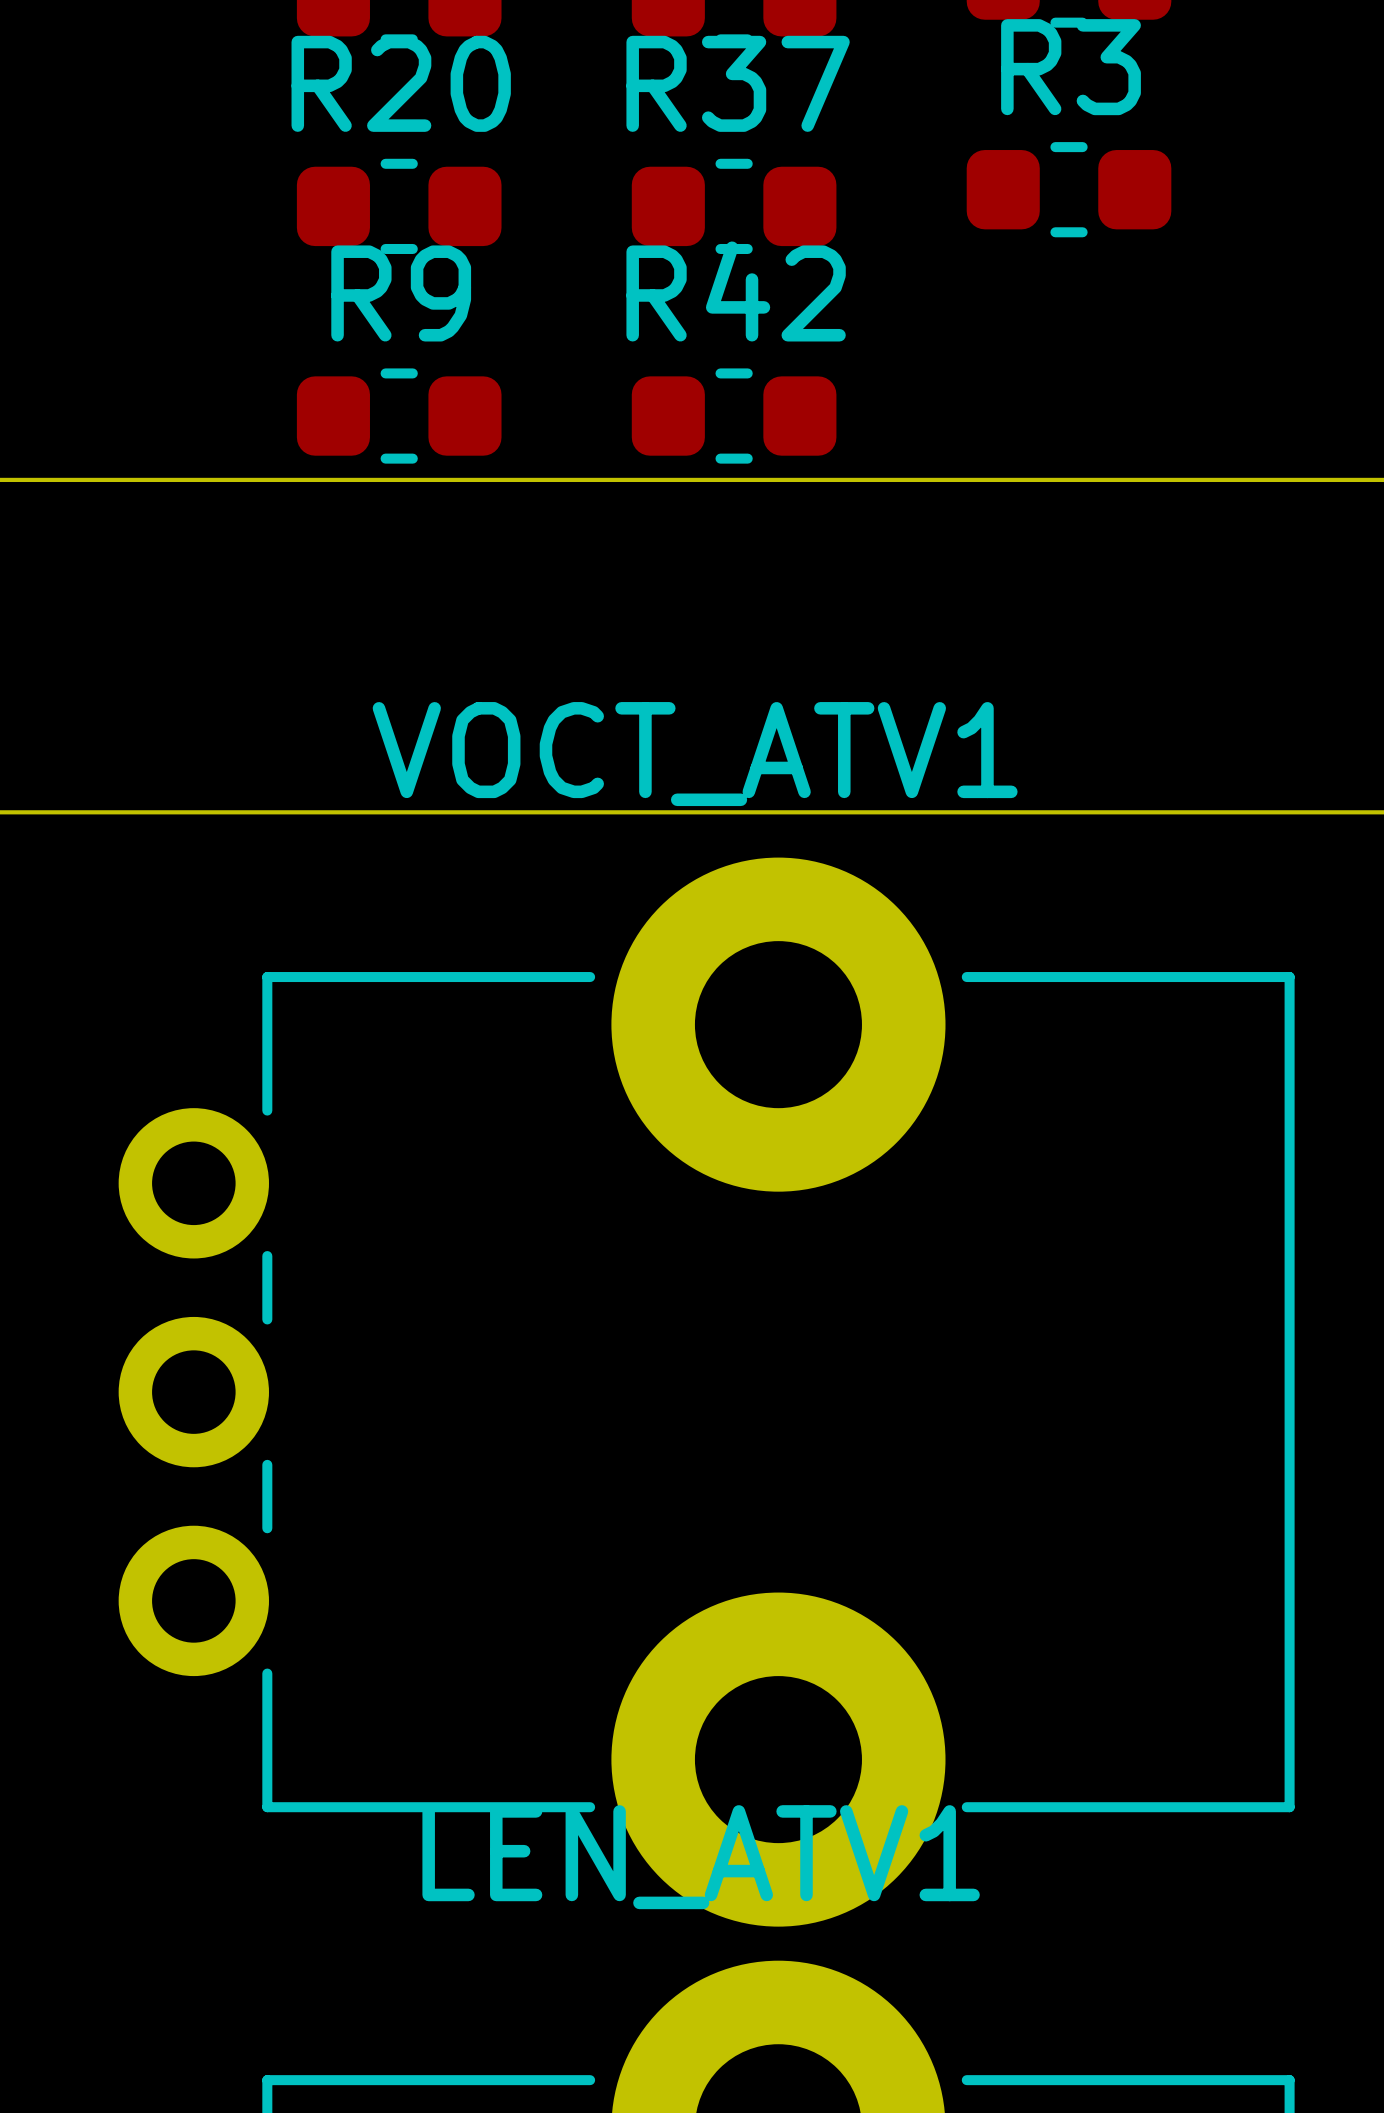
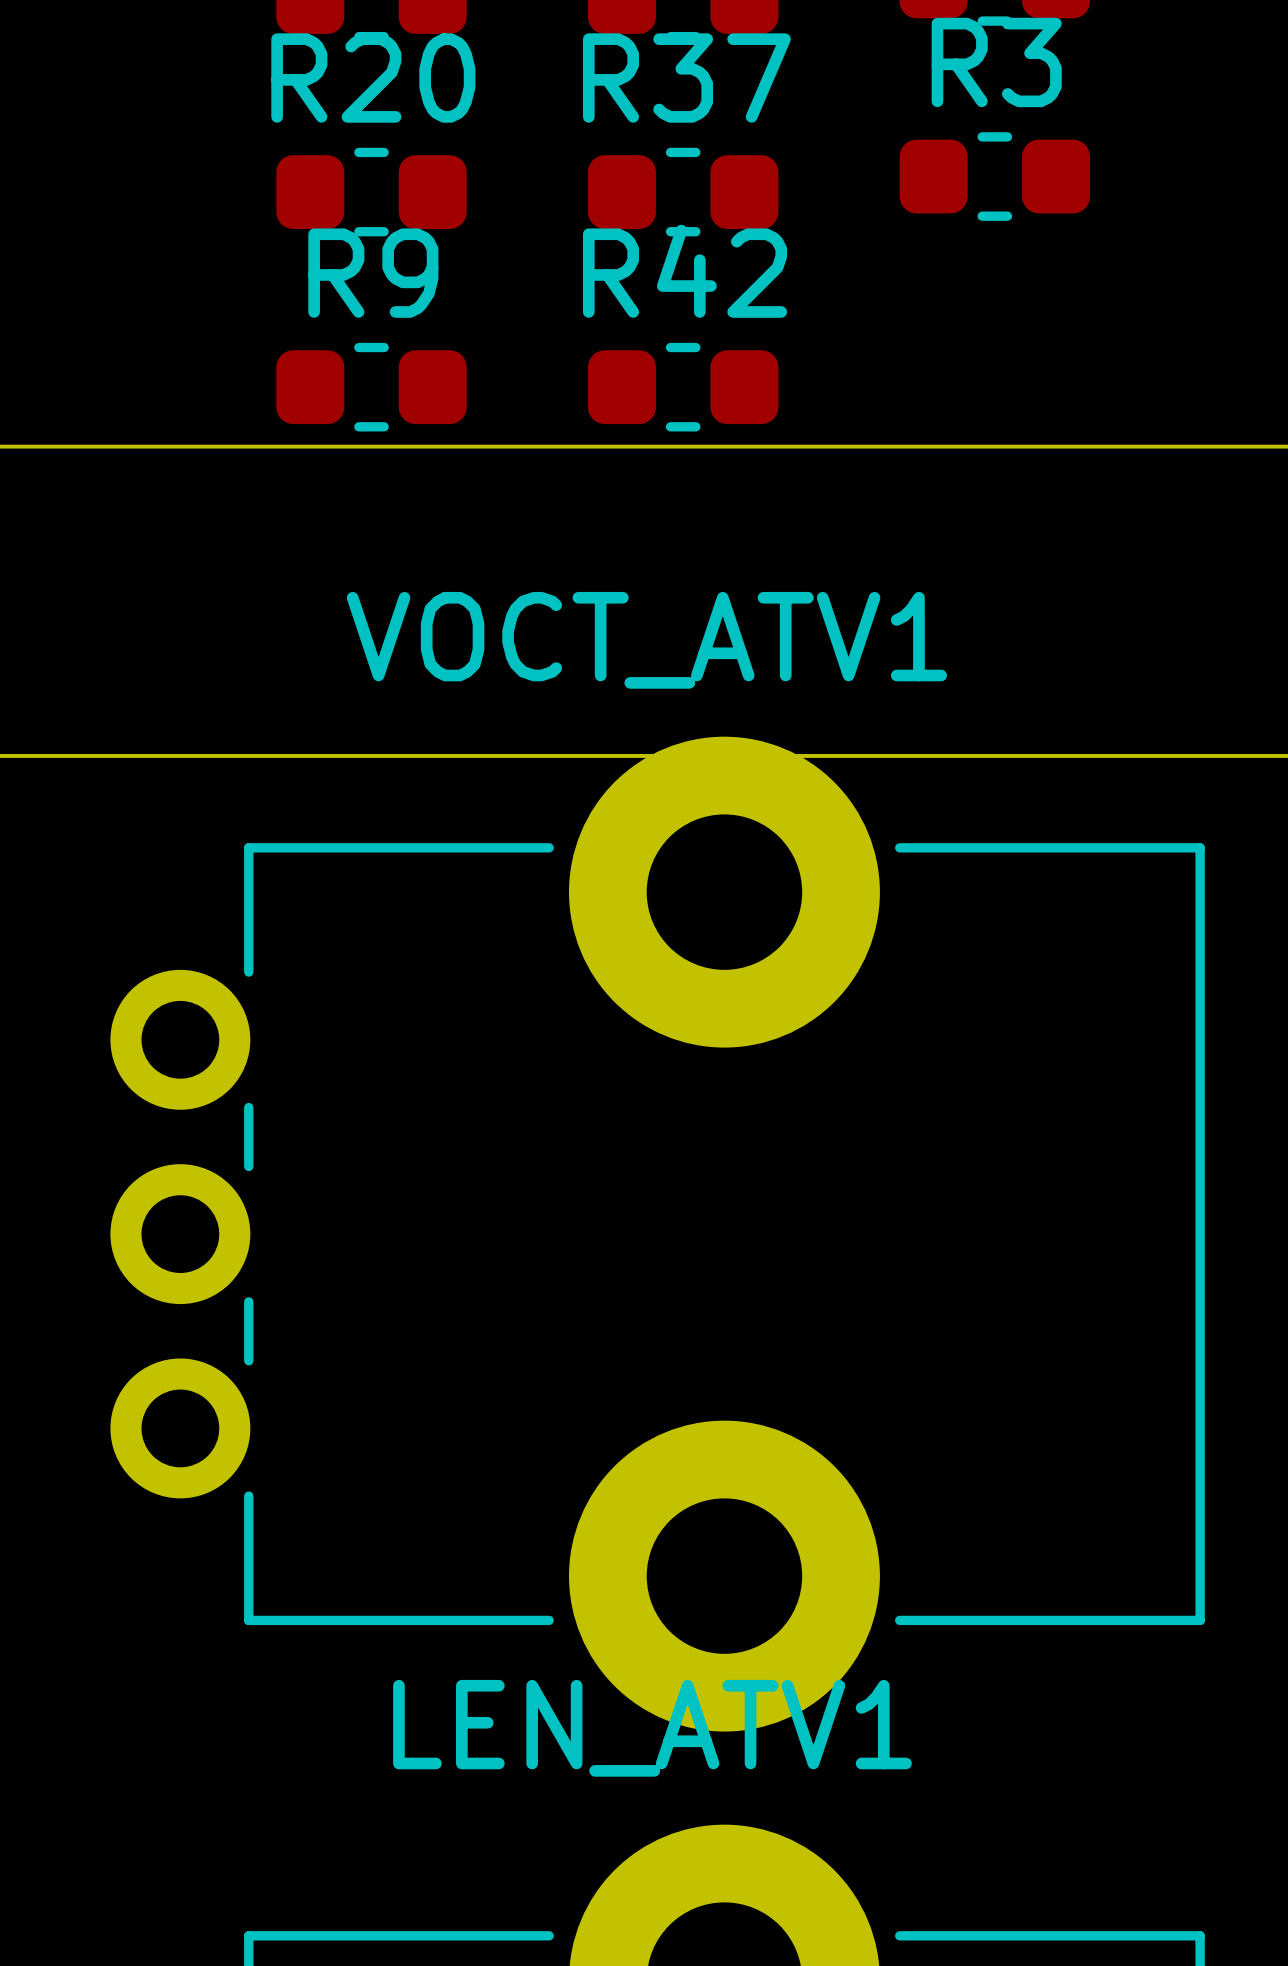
VOCT_ATV1 position: (706, 1392) -> (657, 1234)

